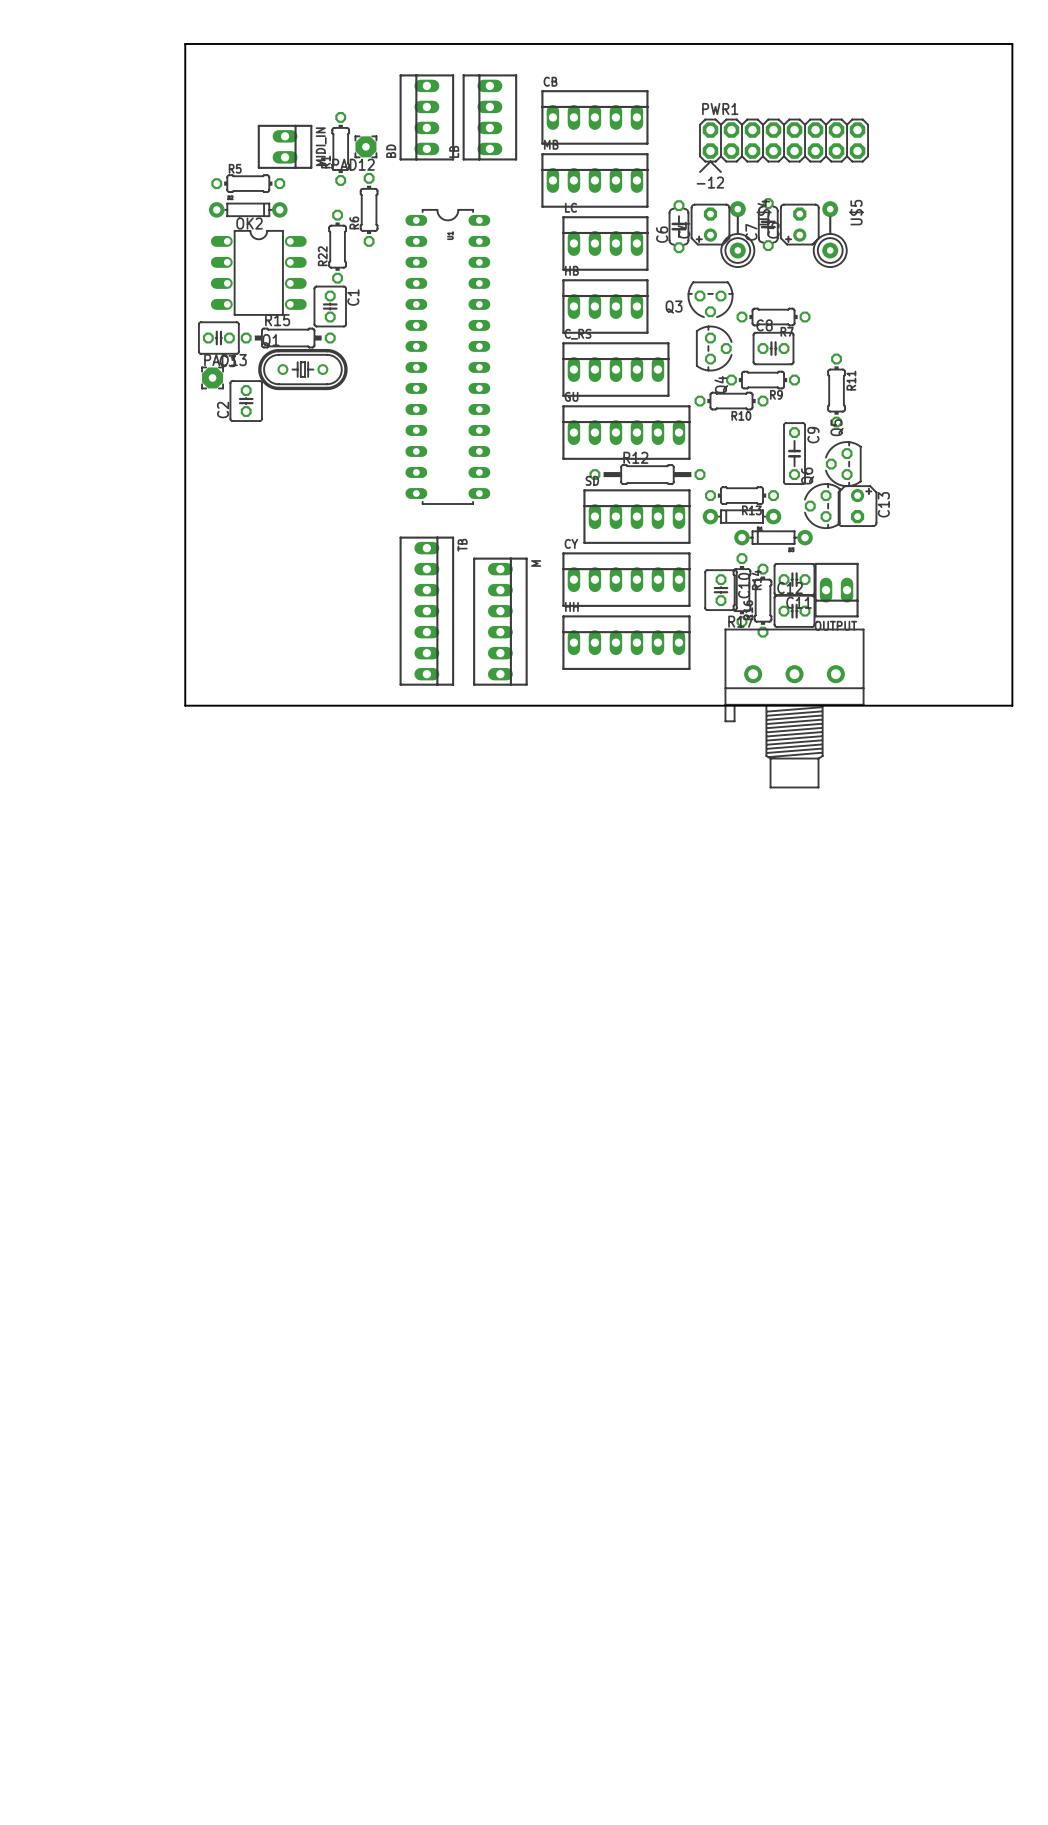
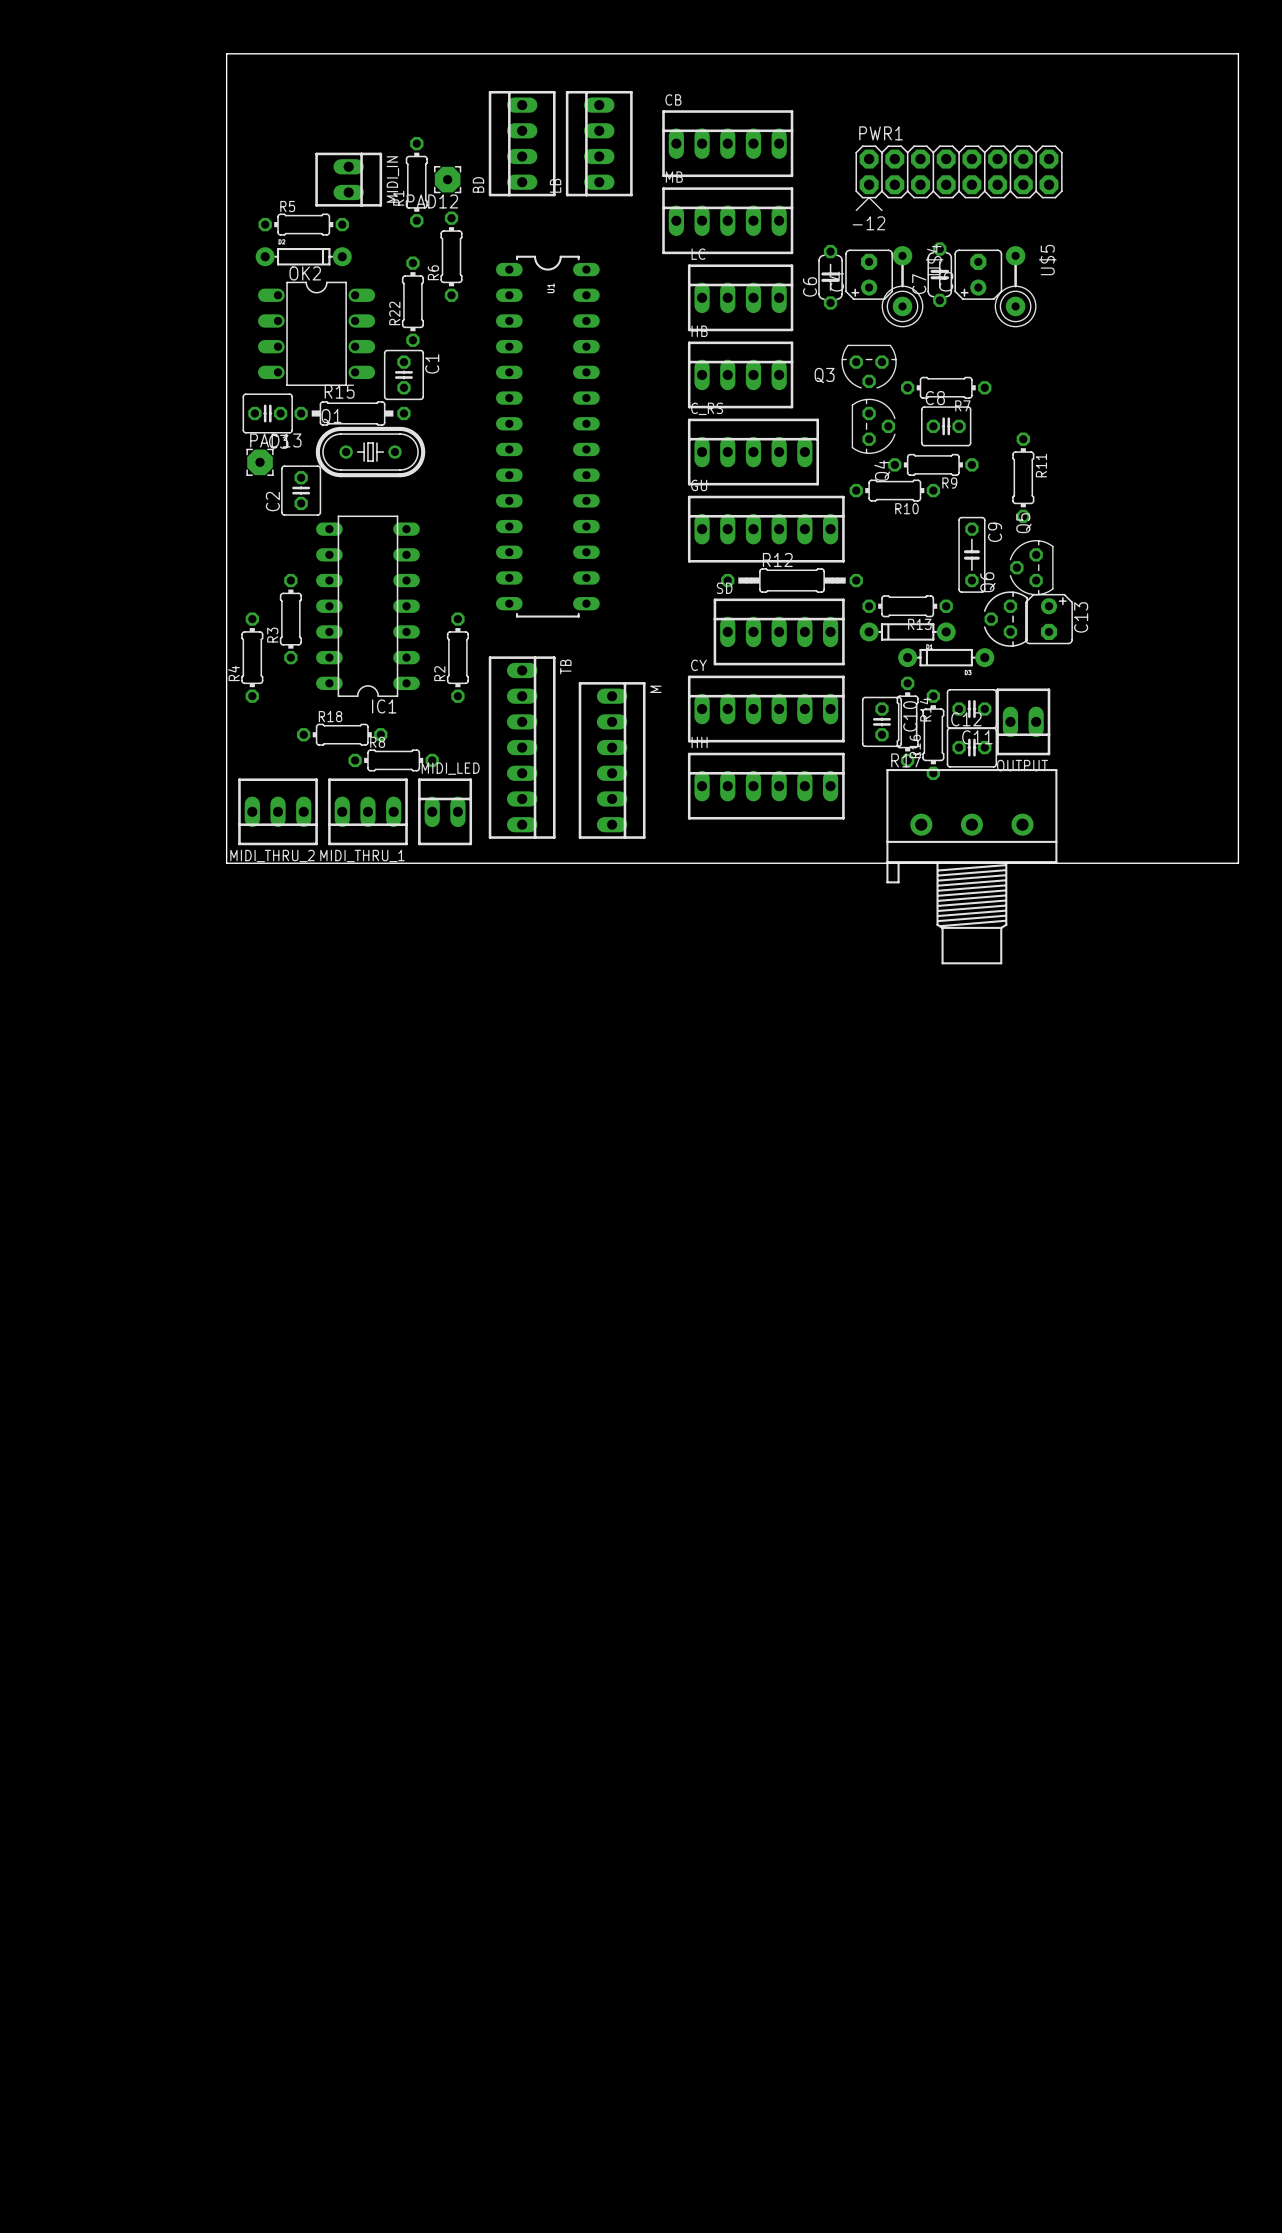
IC1: none -> (367, 606)
R3: none -> (290, 619)
R4: none -> (252, 657)
R2: none -> (457, 657)
R18: none -> (342, 734)
R8: none -> (393, 760)
MIDI_THRU_2: none -> (278, 811)
MIDI_THRU_1: none -> (367, 811)
MIDI_LED: none -> (445, 811)

